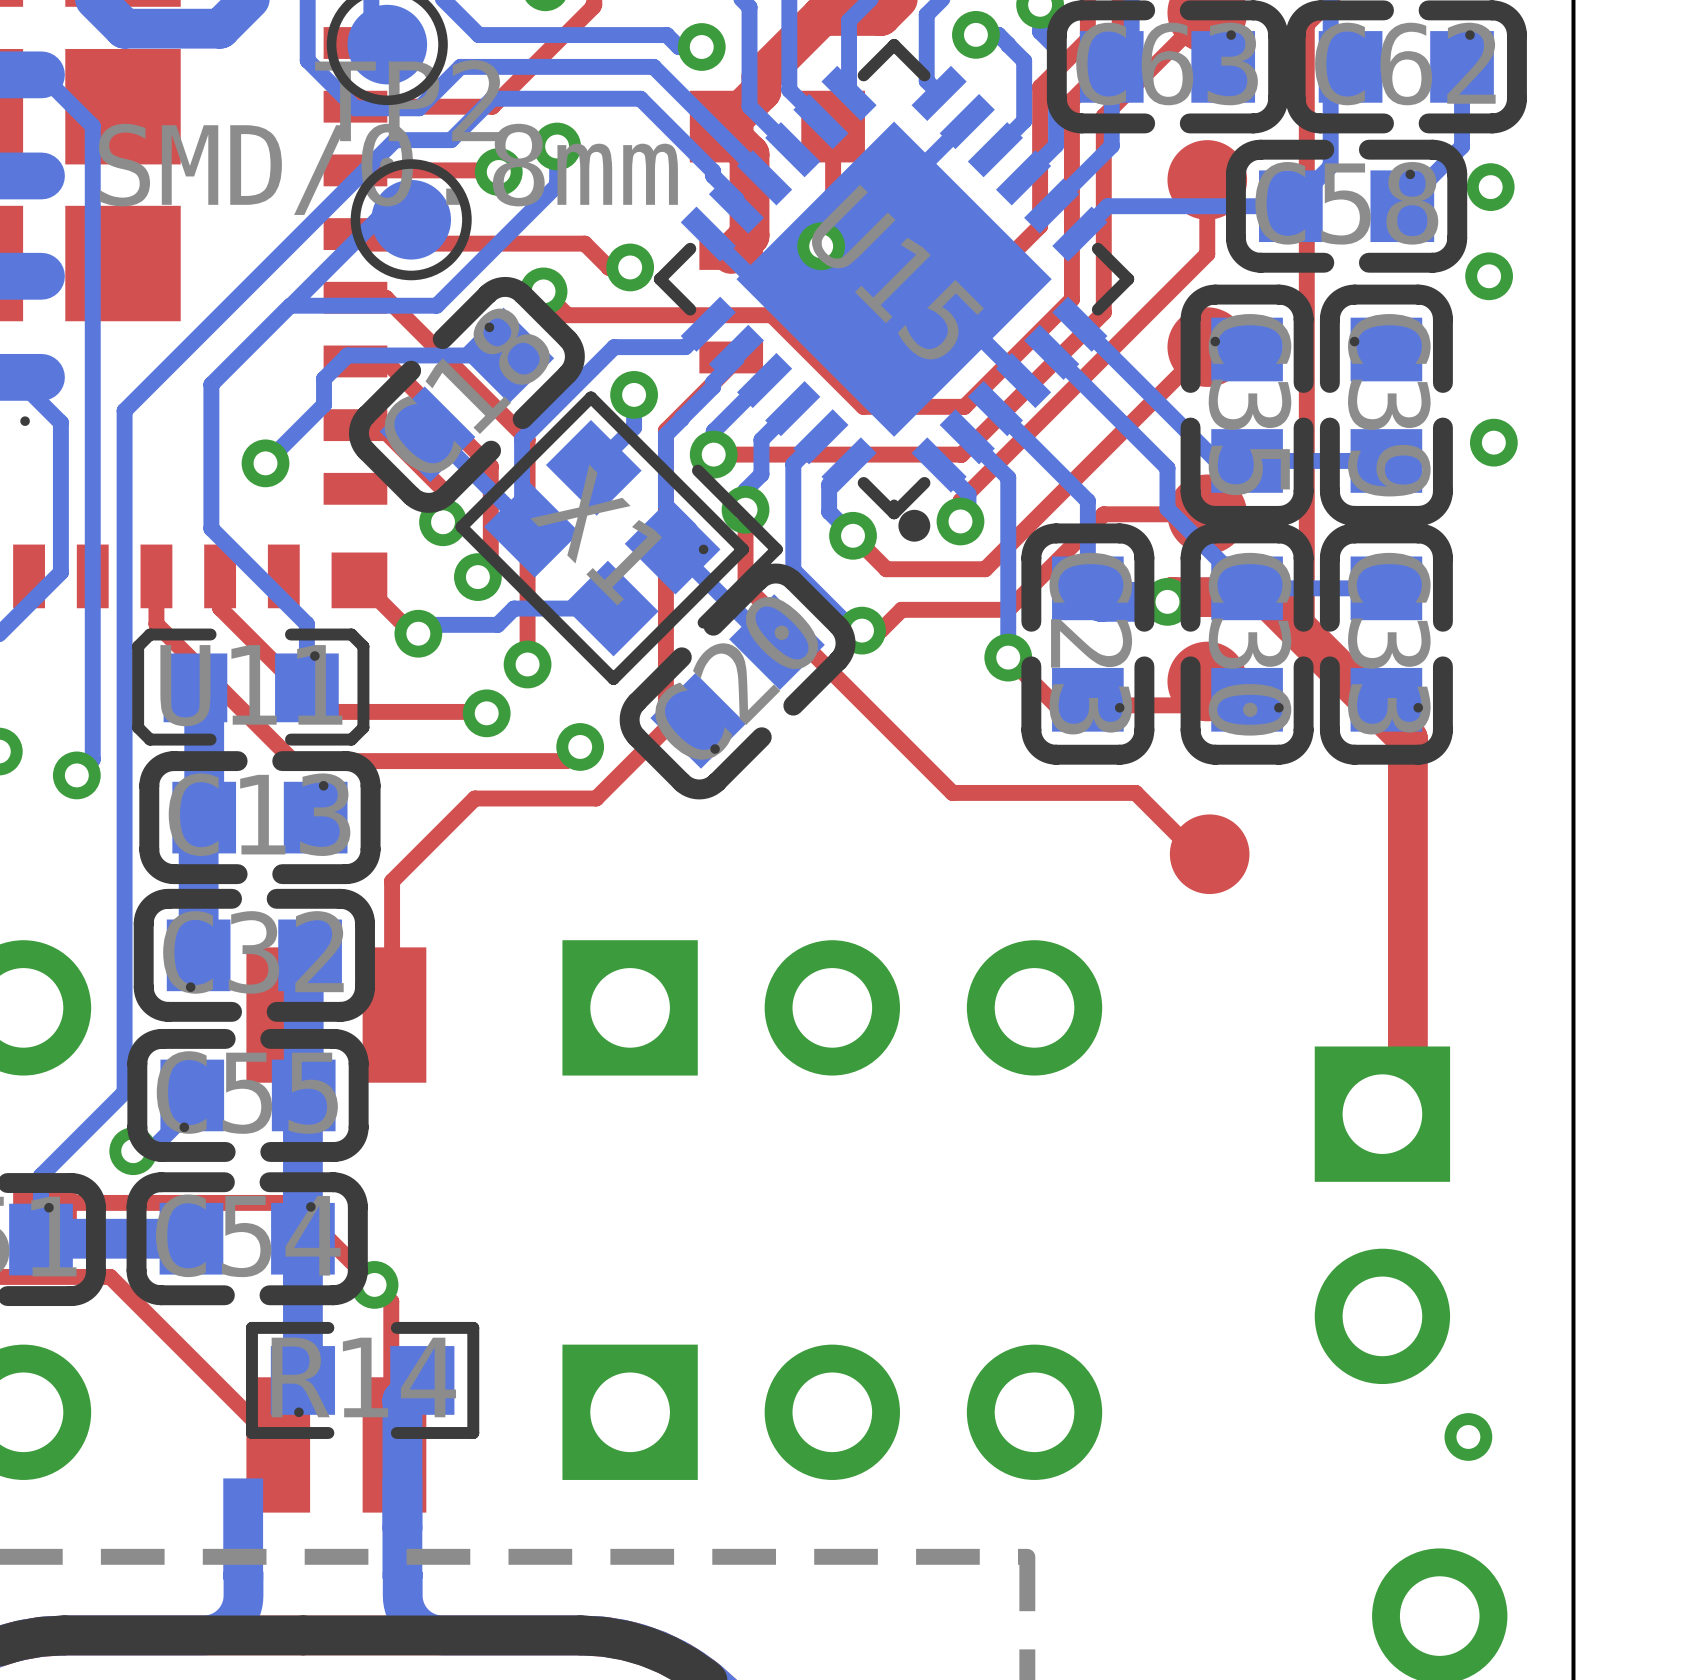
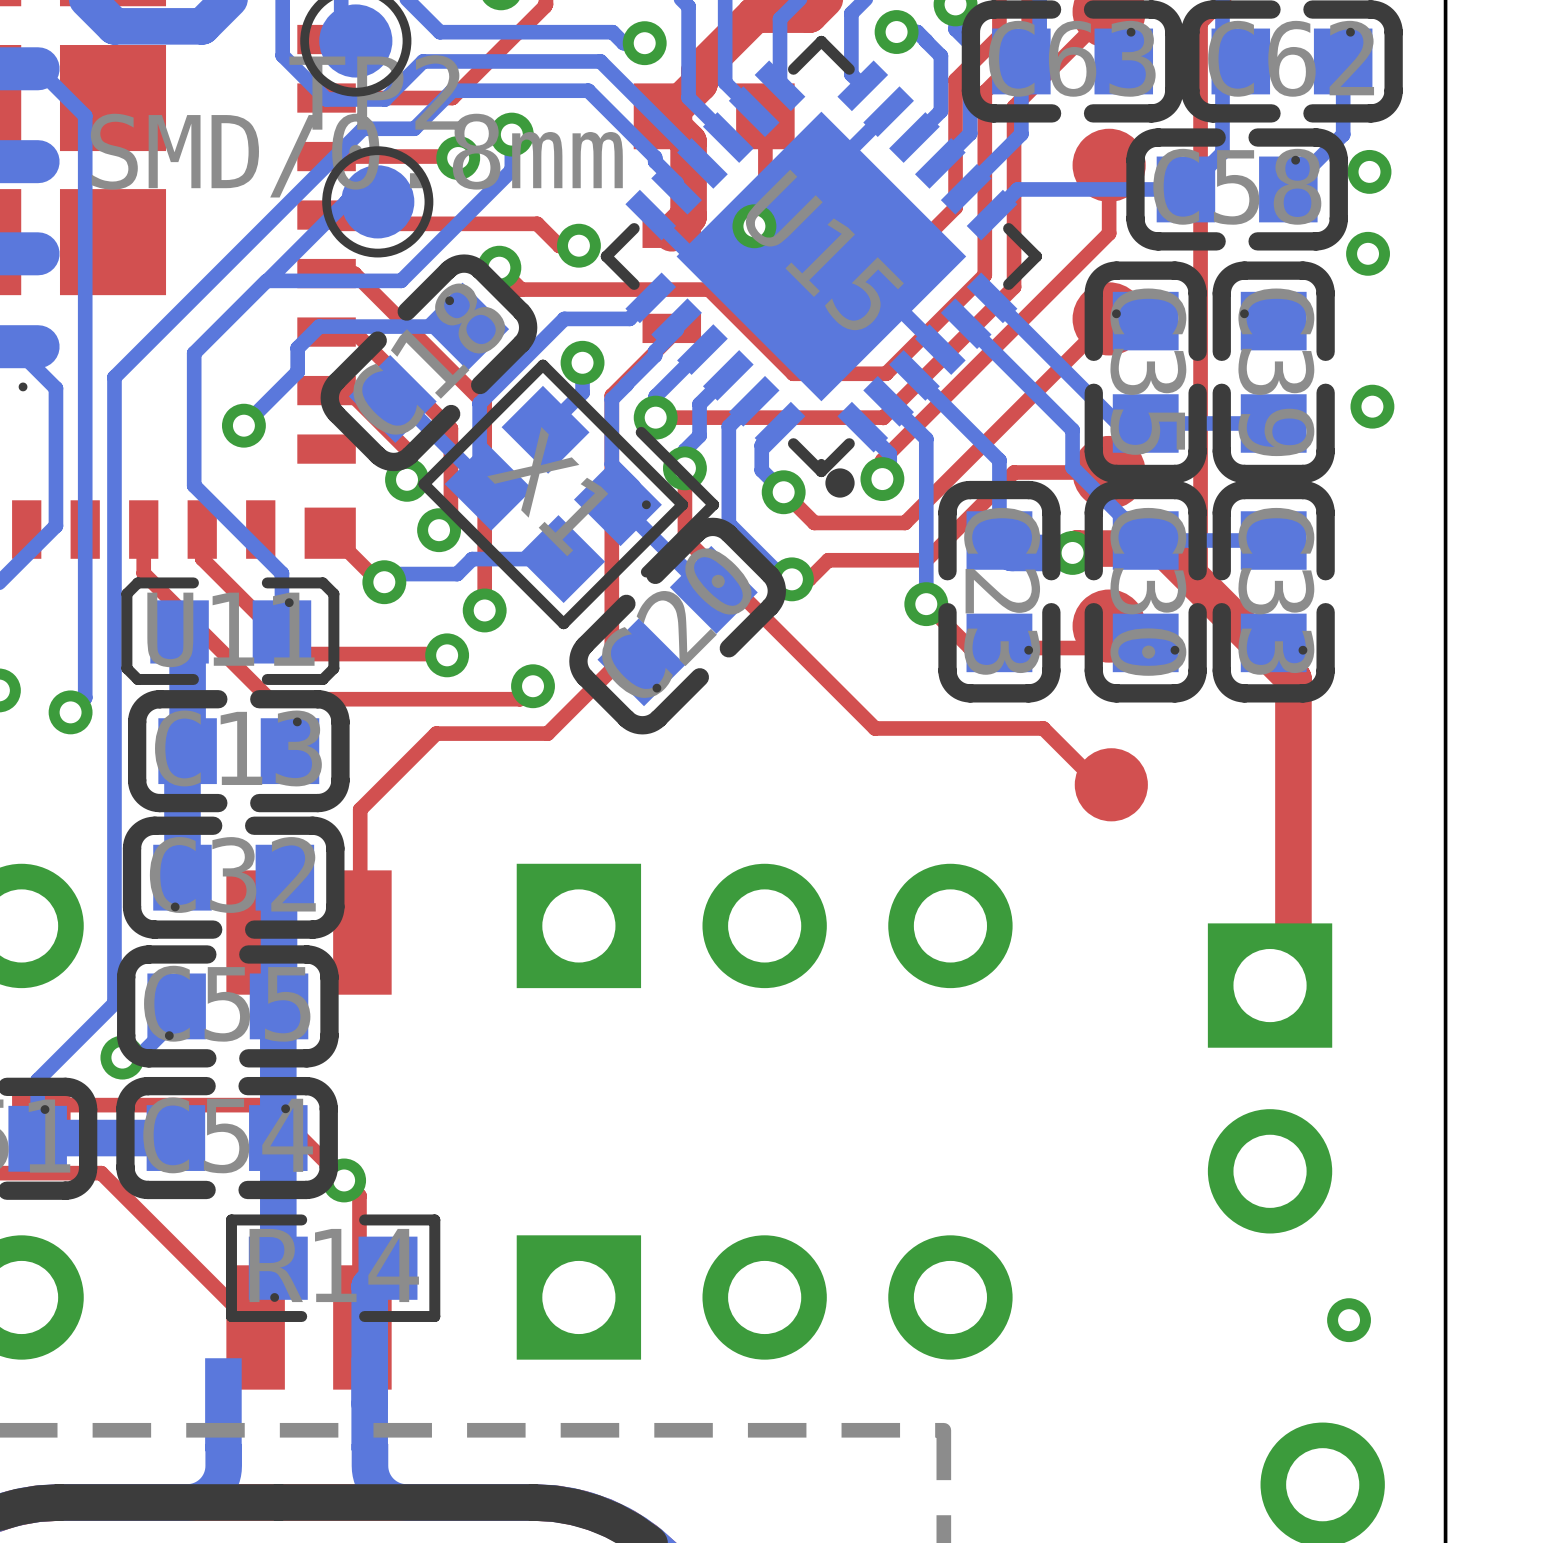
part position: (1382, 1215) -> (1270, 1078)

